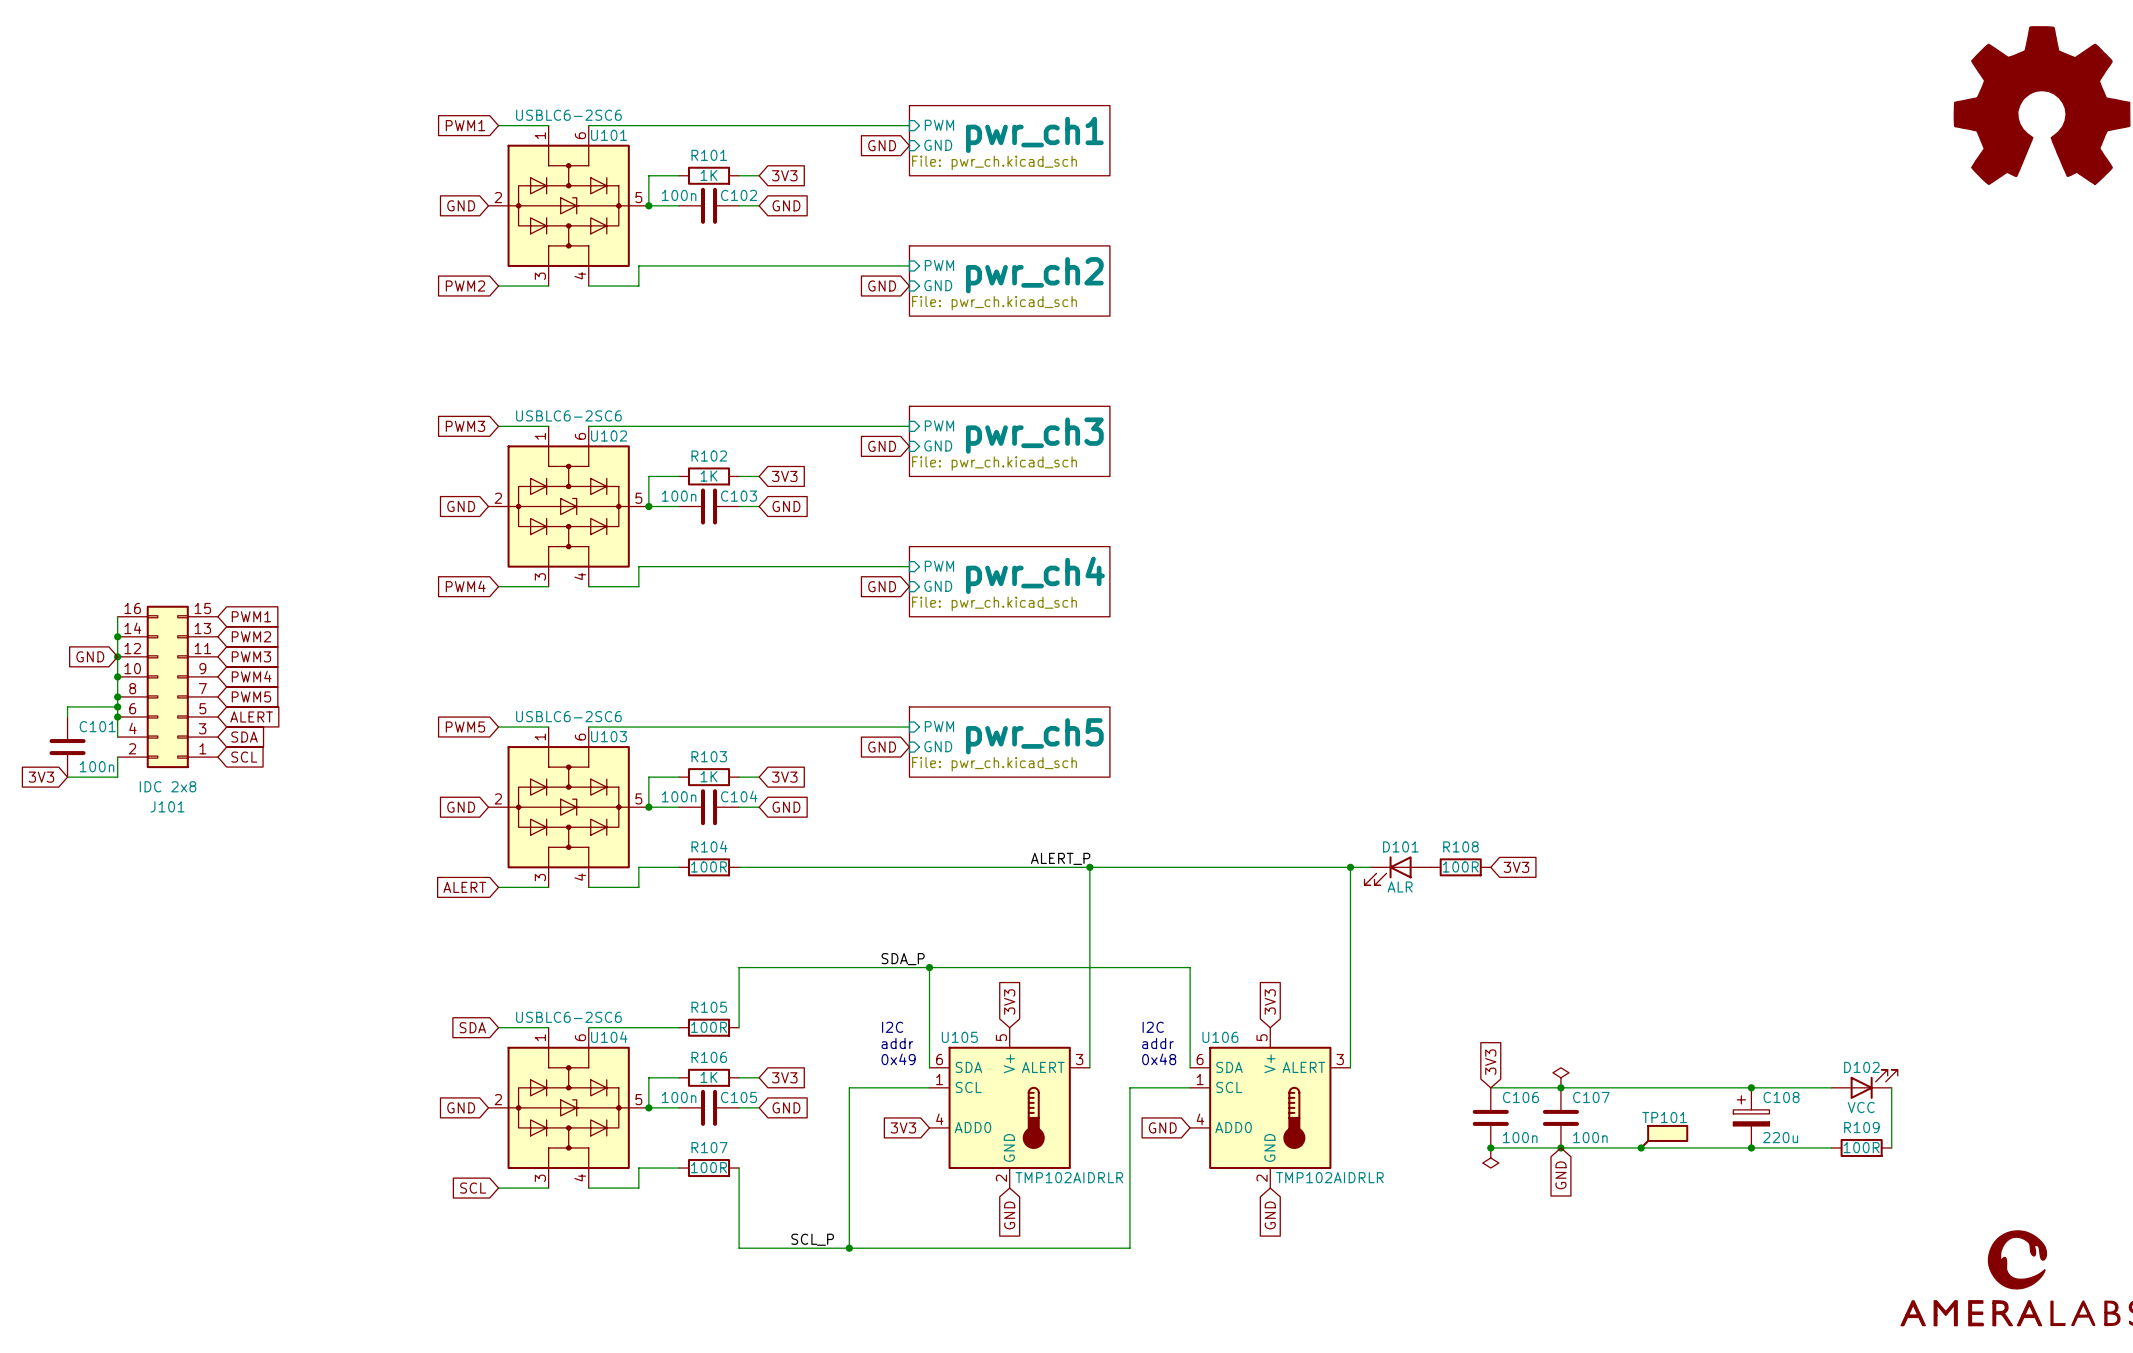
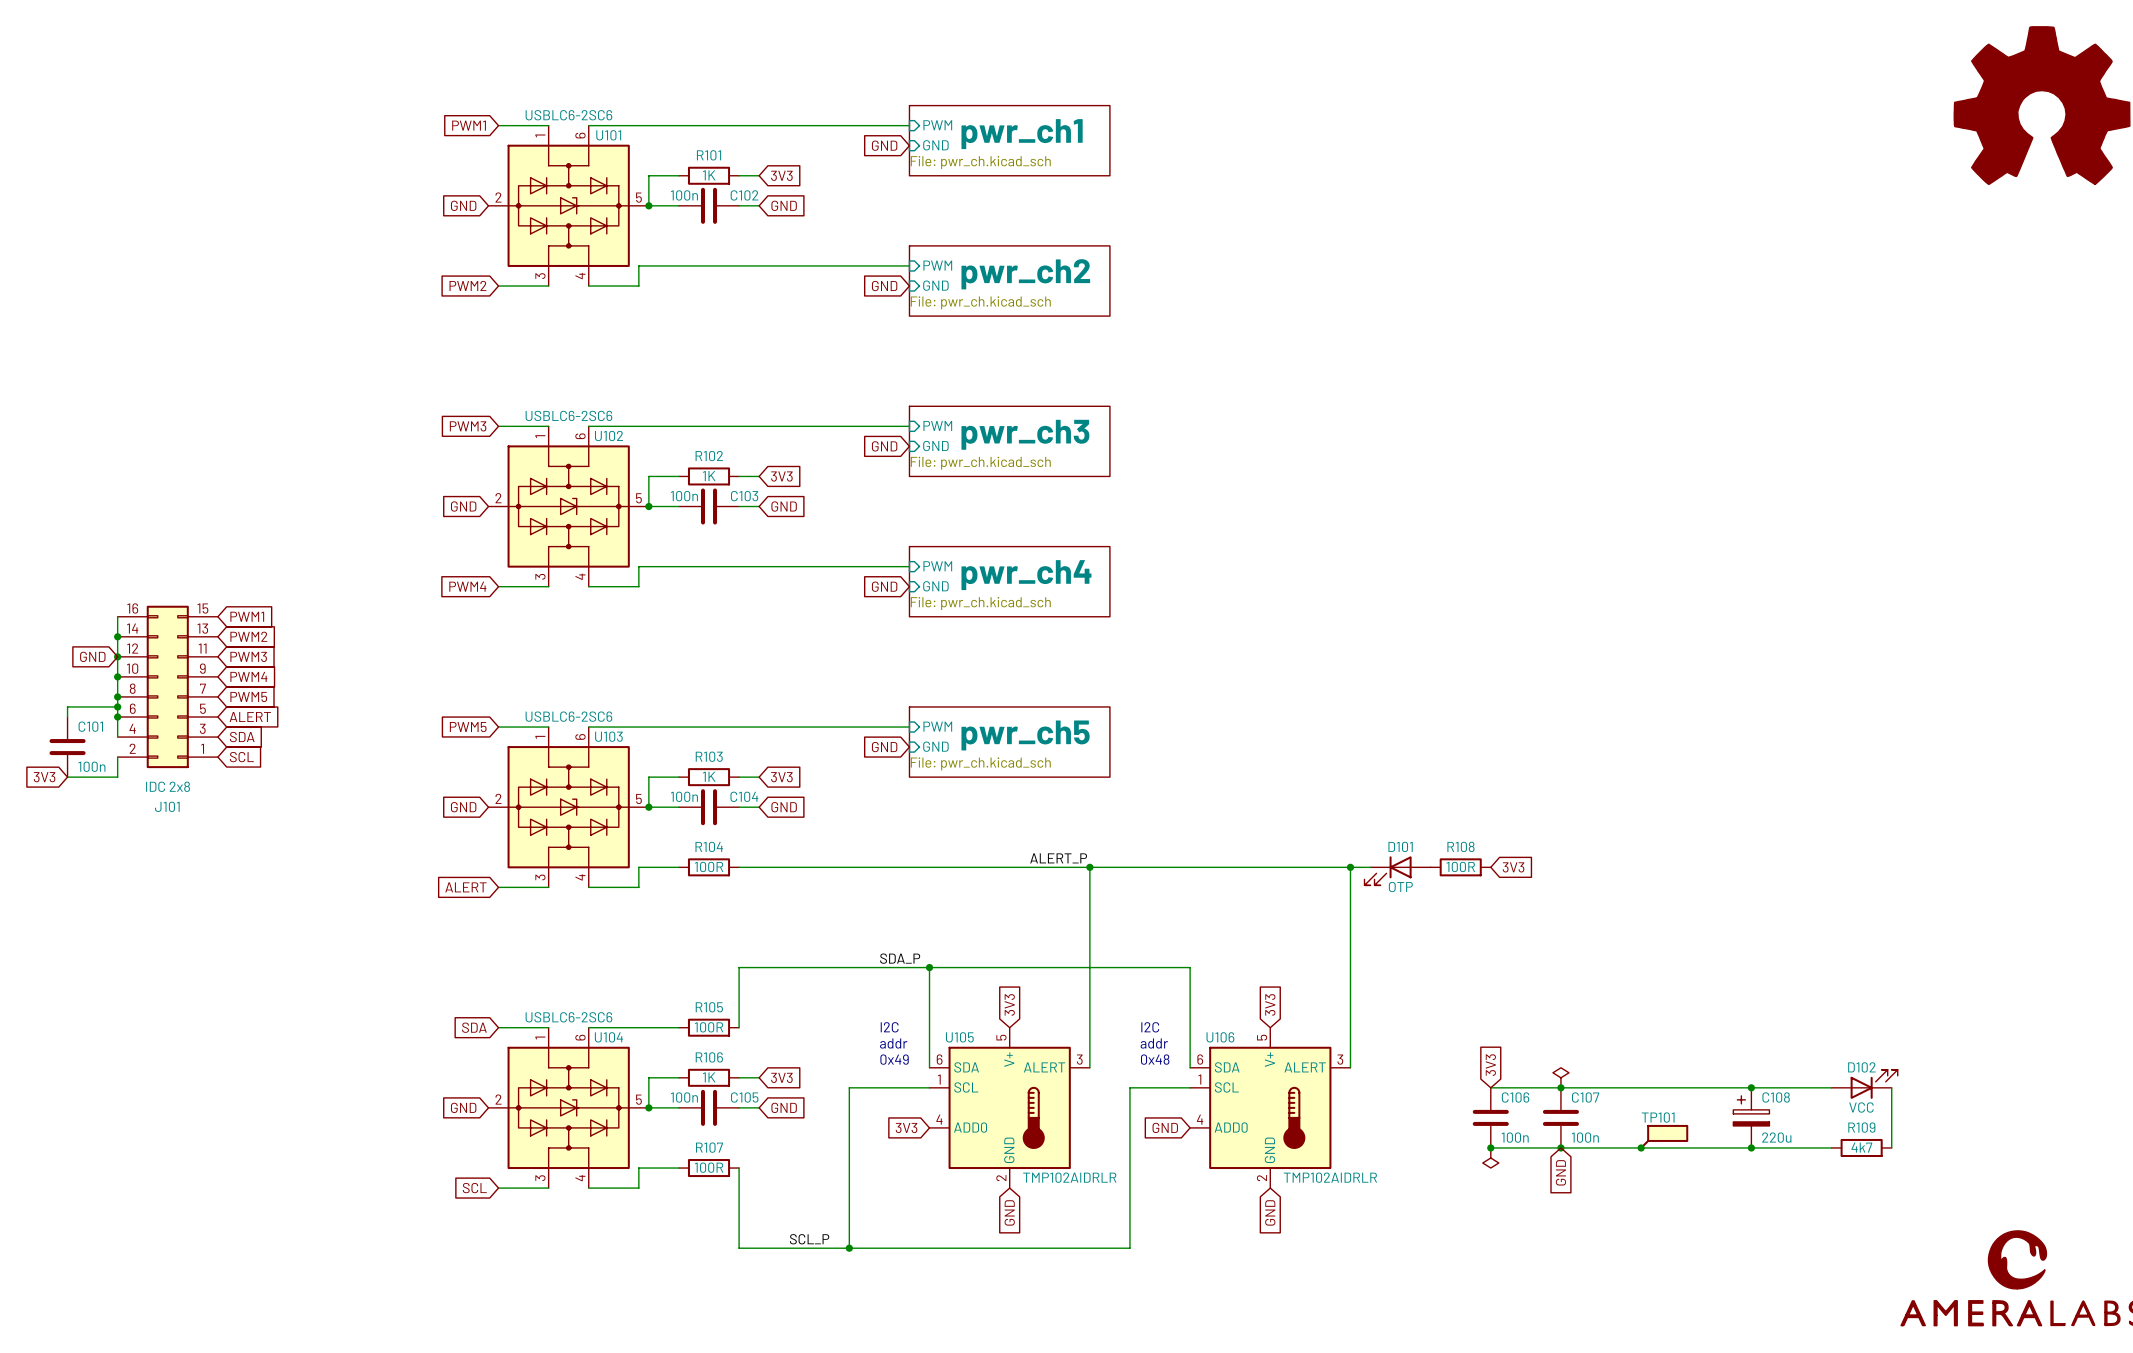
D101 value: ALR (1400, 887) -> OTP (1400, 887)
R109 value: 100R (1861, 1147) -> 4k7 (1861, 1147)

